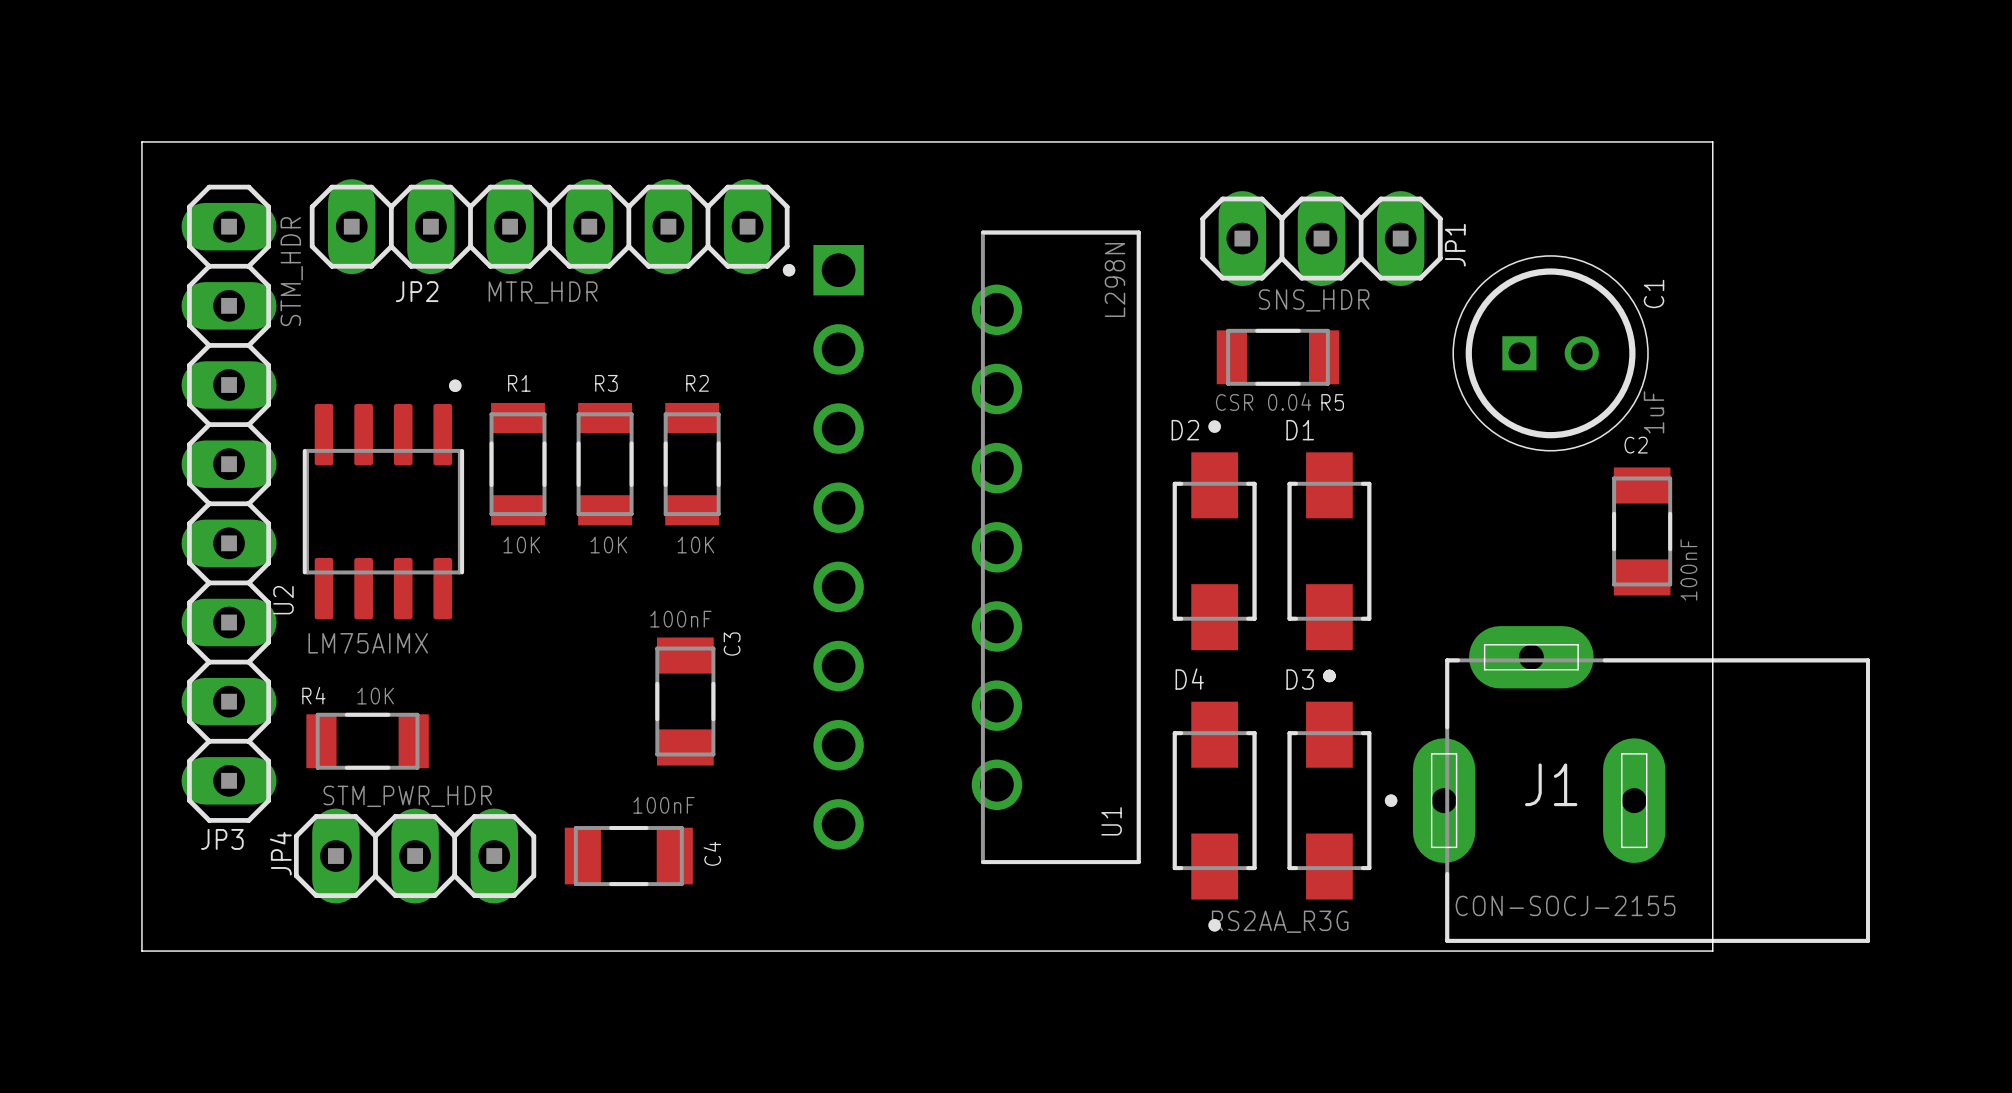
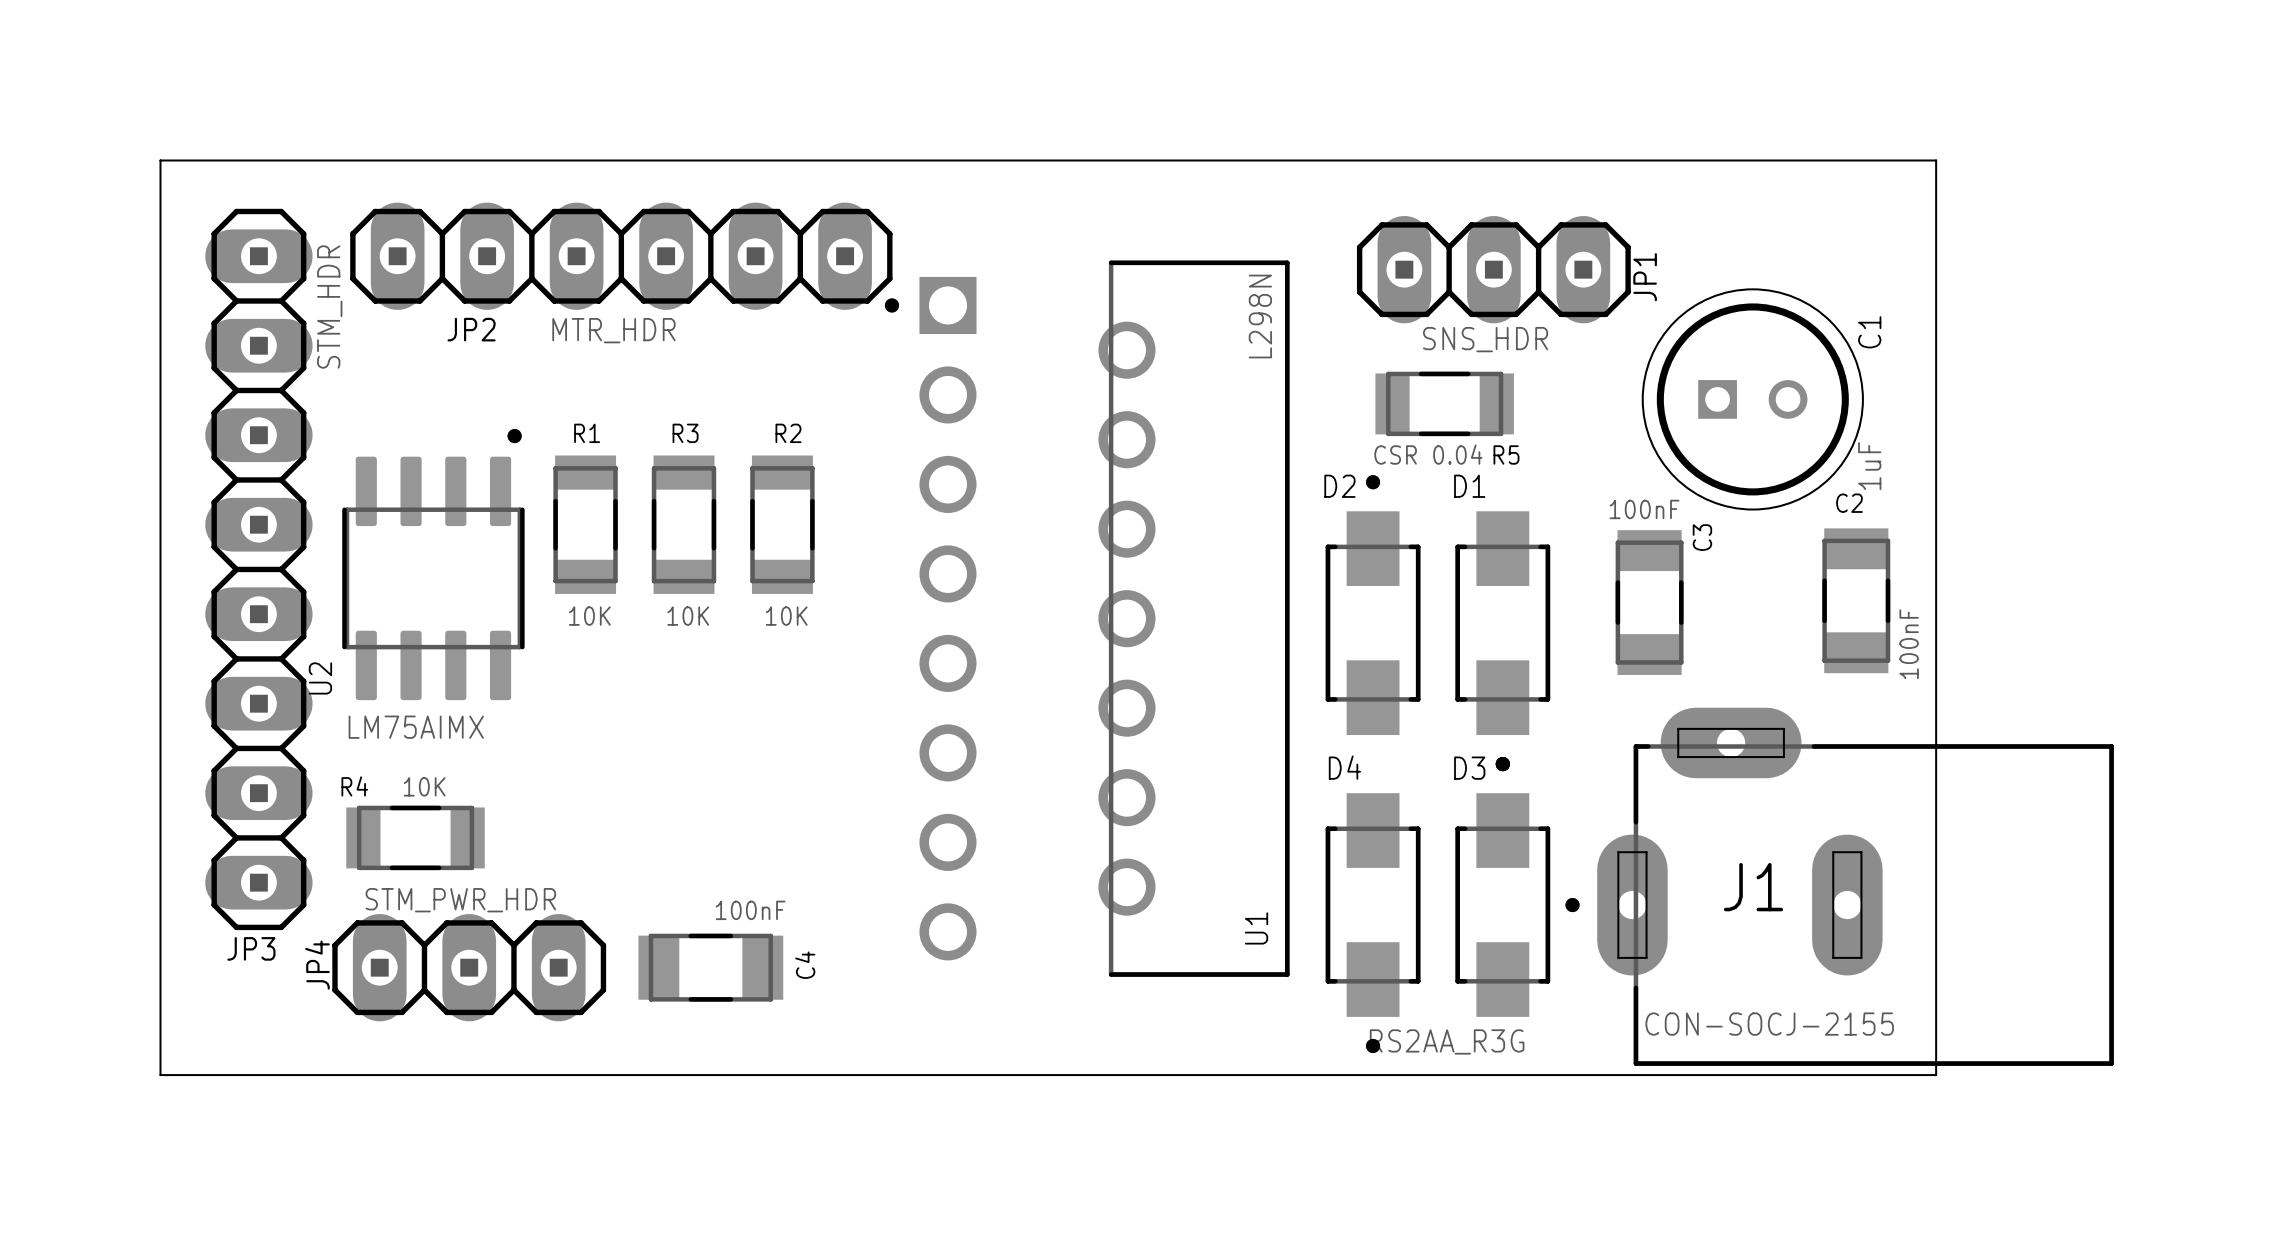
C3 position: (685, 701) -> (1649, 602)

